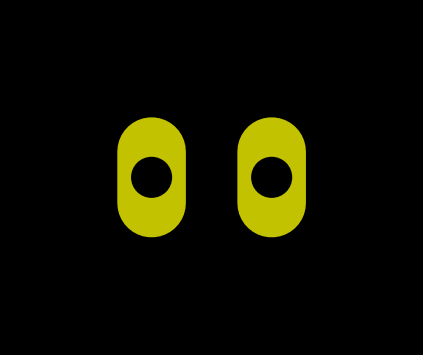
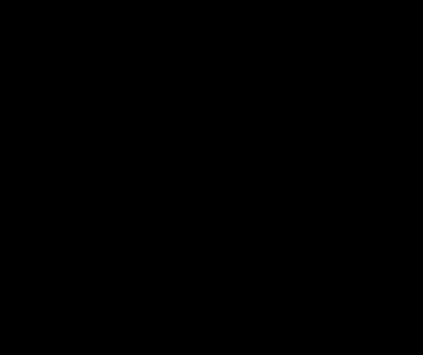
part: (211, 177) -> none

